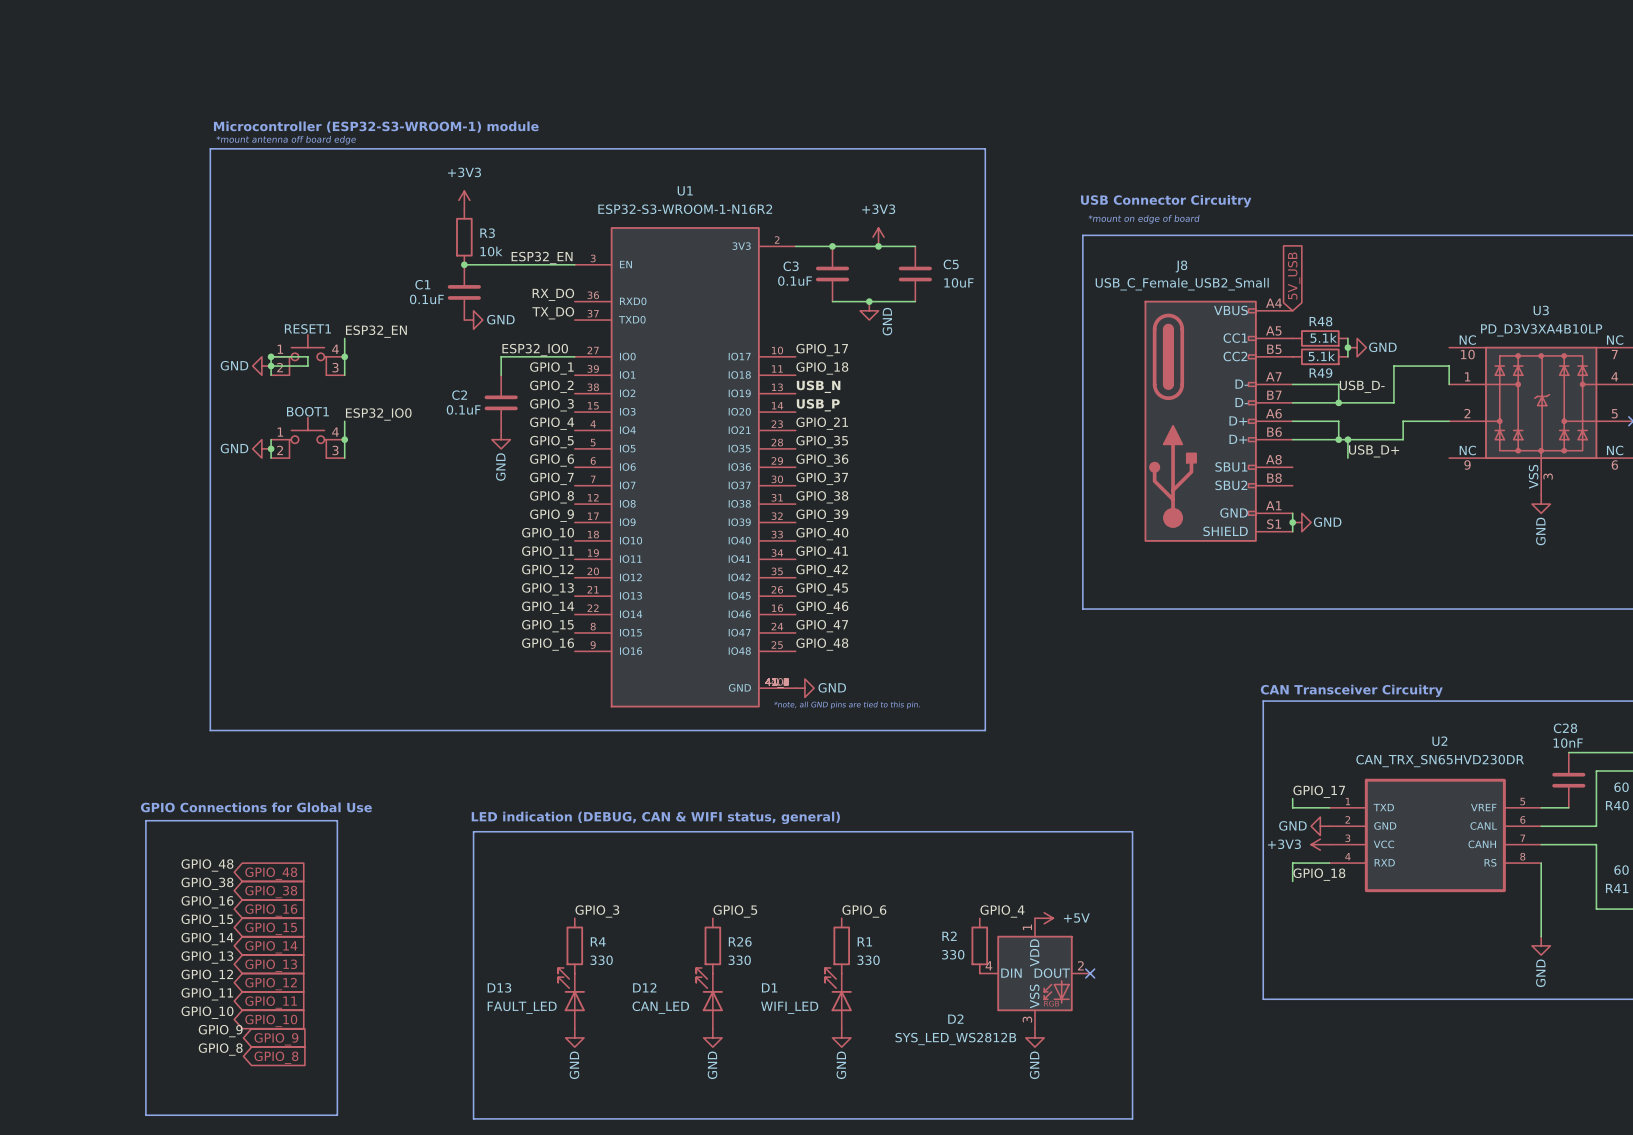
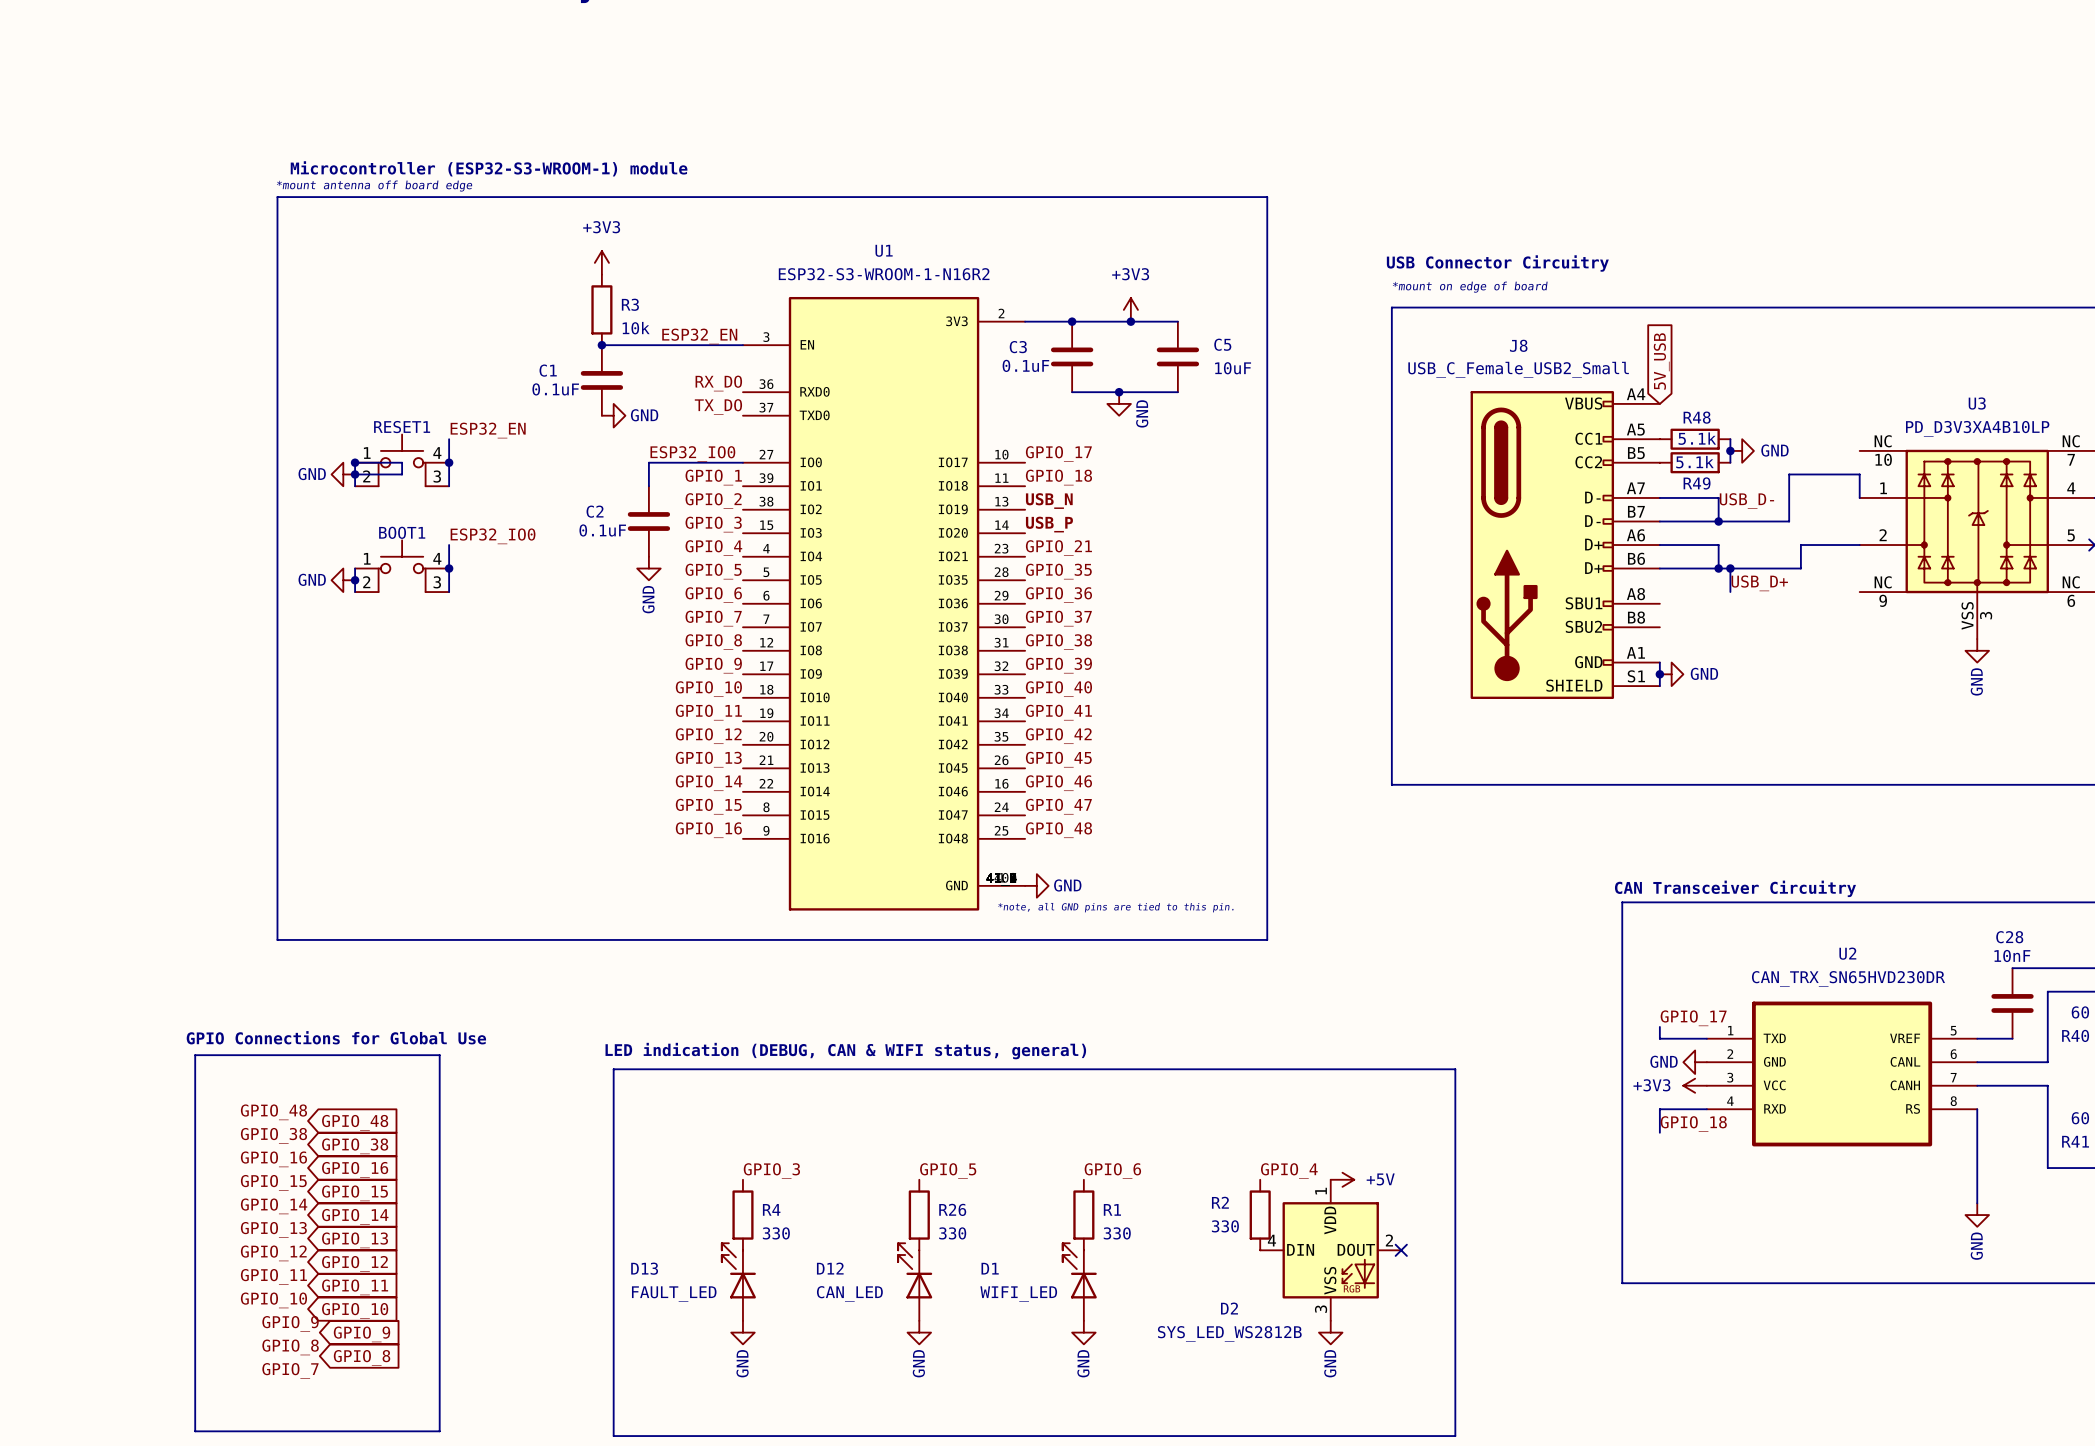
label: none -> GPIO_7 (290, 1370)

